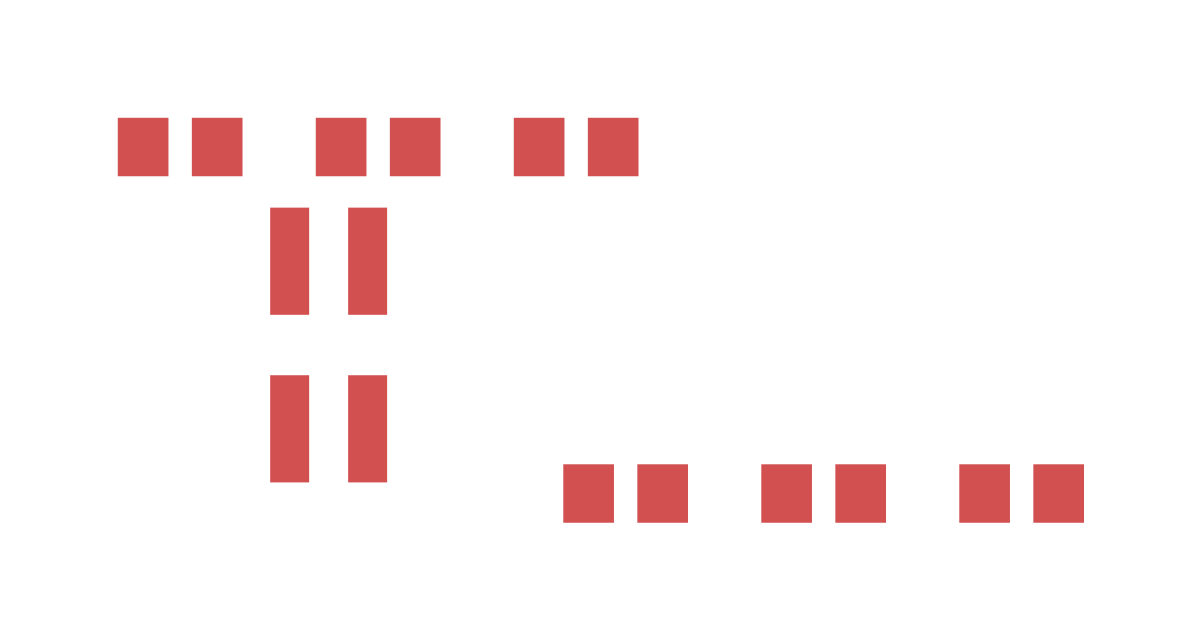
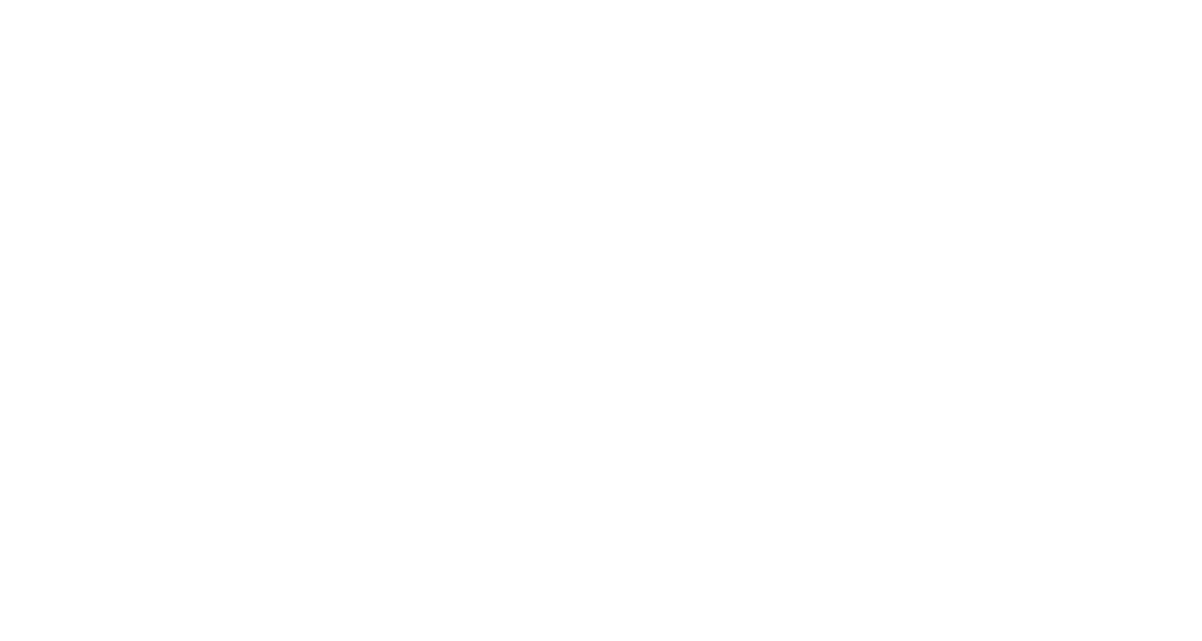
part: (180, 147) -> none
part: (378, 147) -> none
part: (576, 147) -> none
part: (328, 345) -> none
part: (625, 493) -> none
part: (823, 493) -> none
part: (1021, 493) -> none

